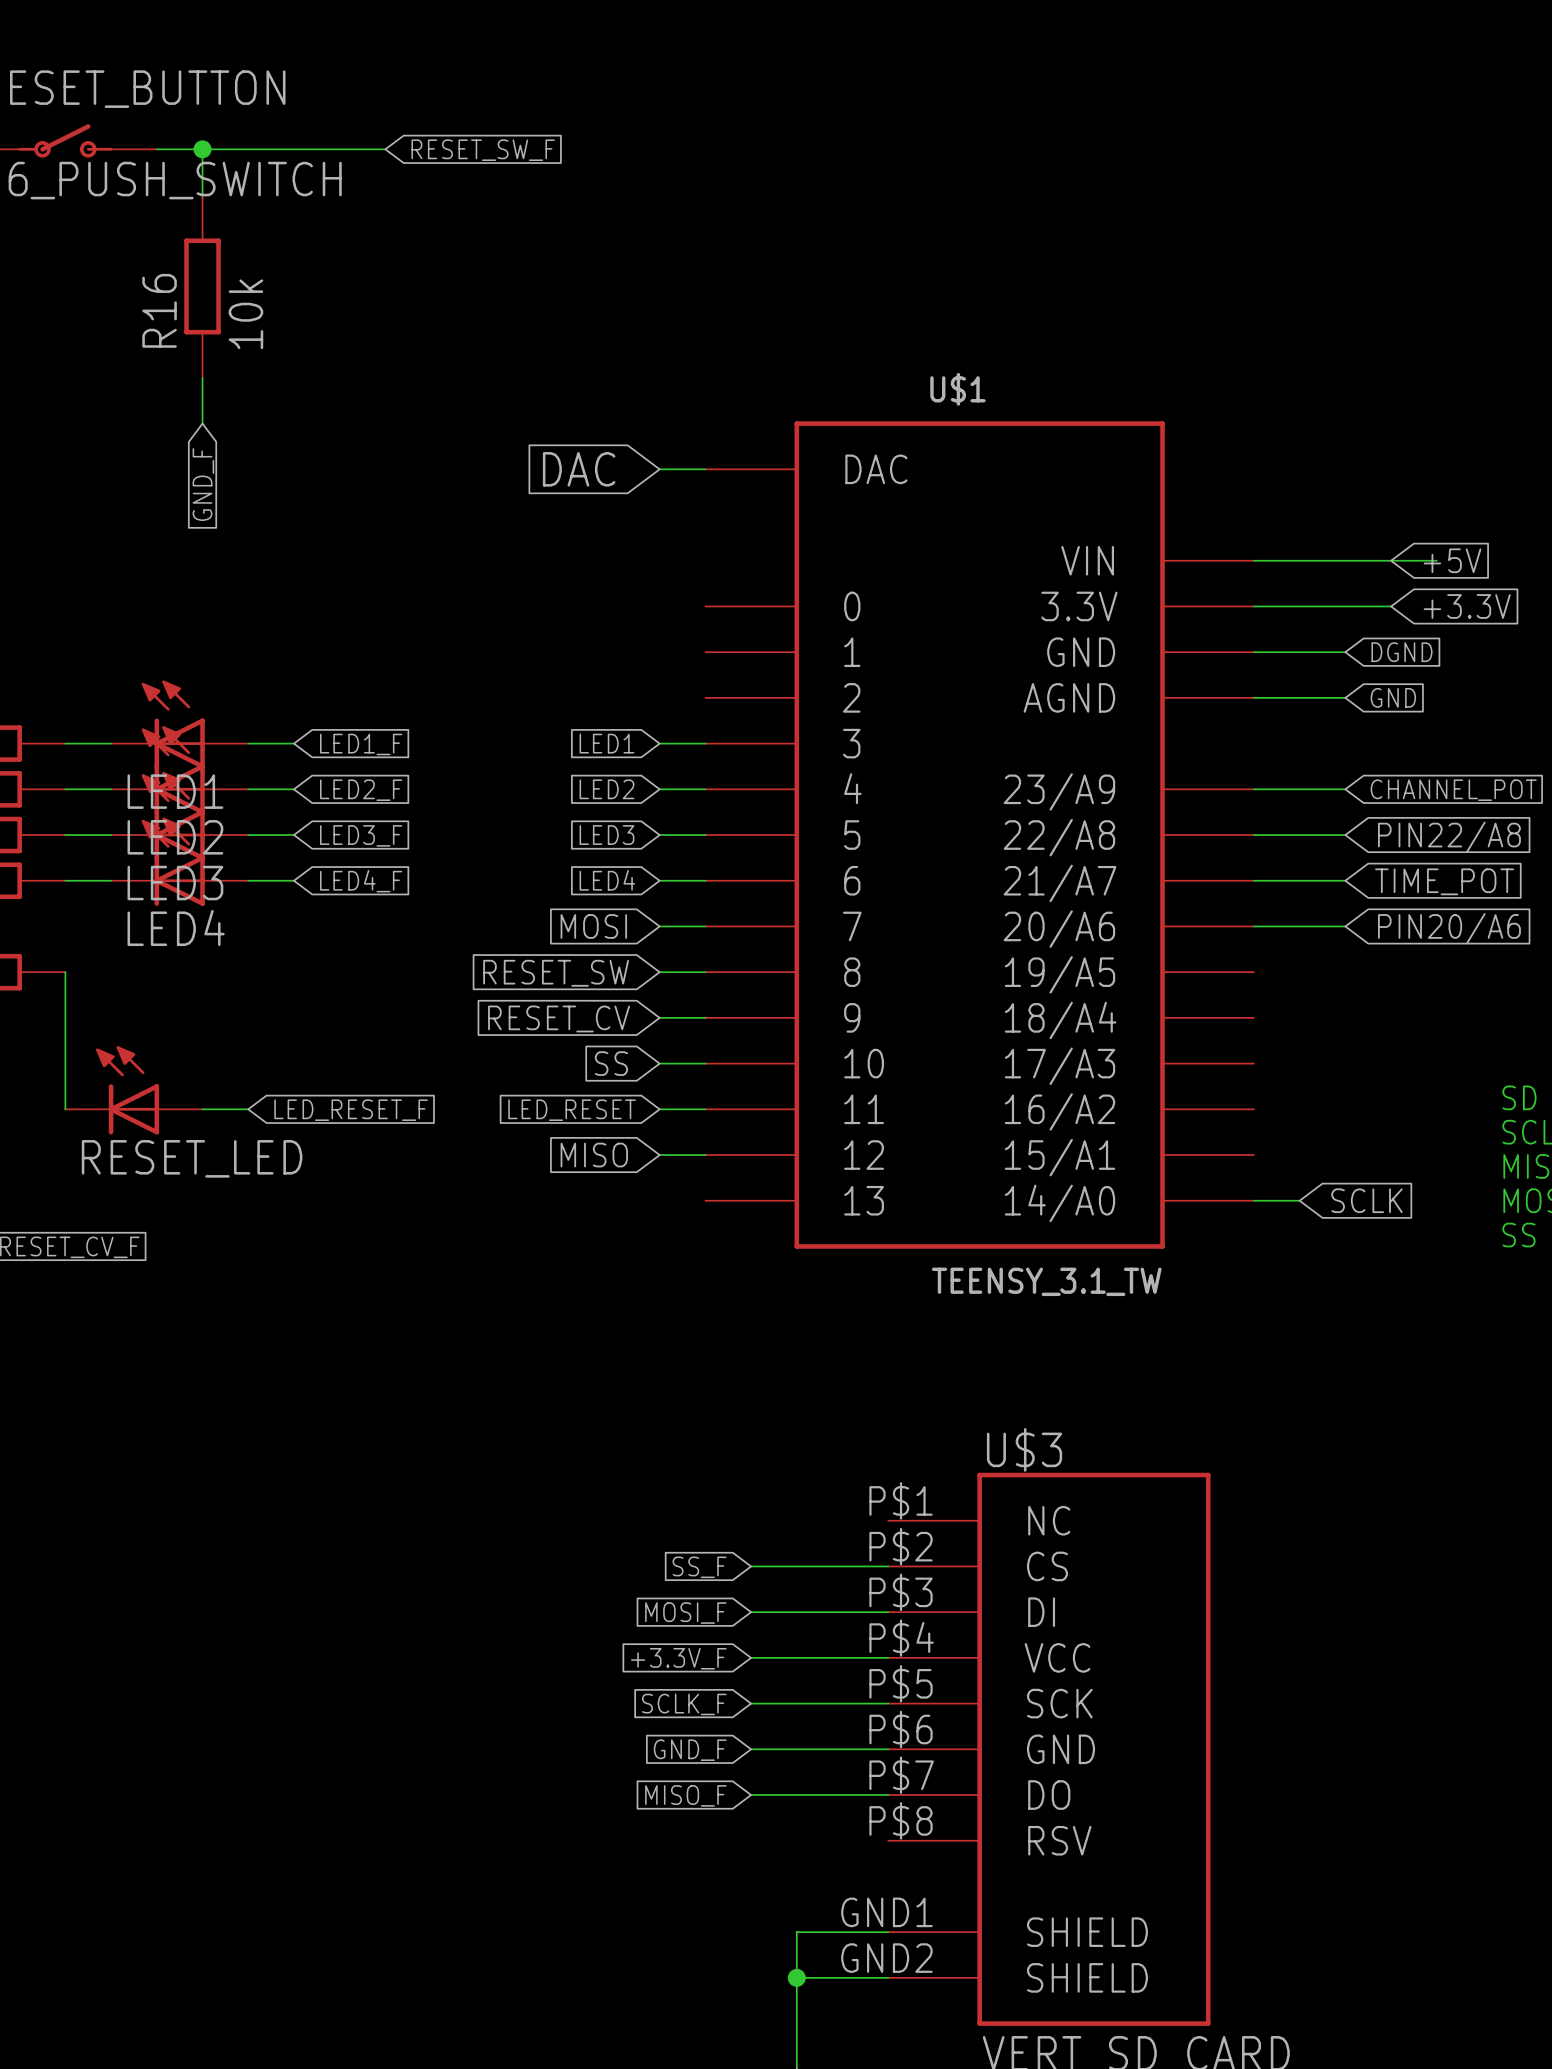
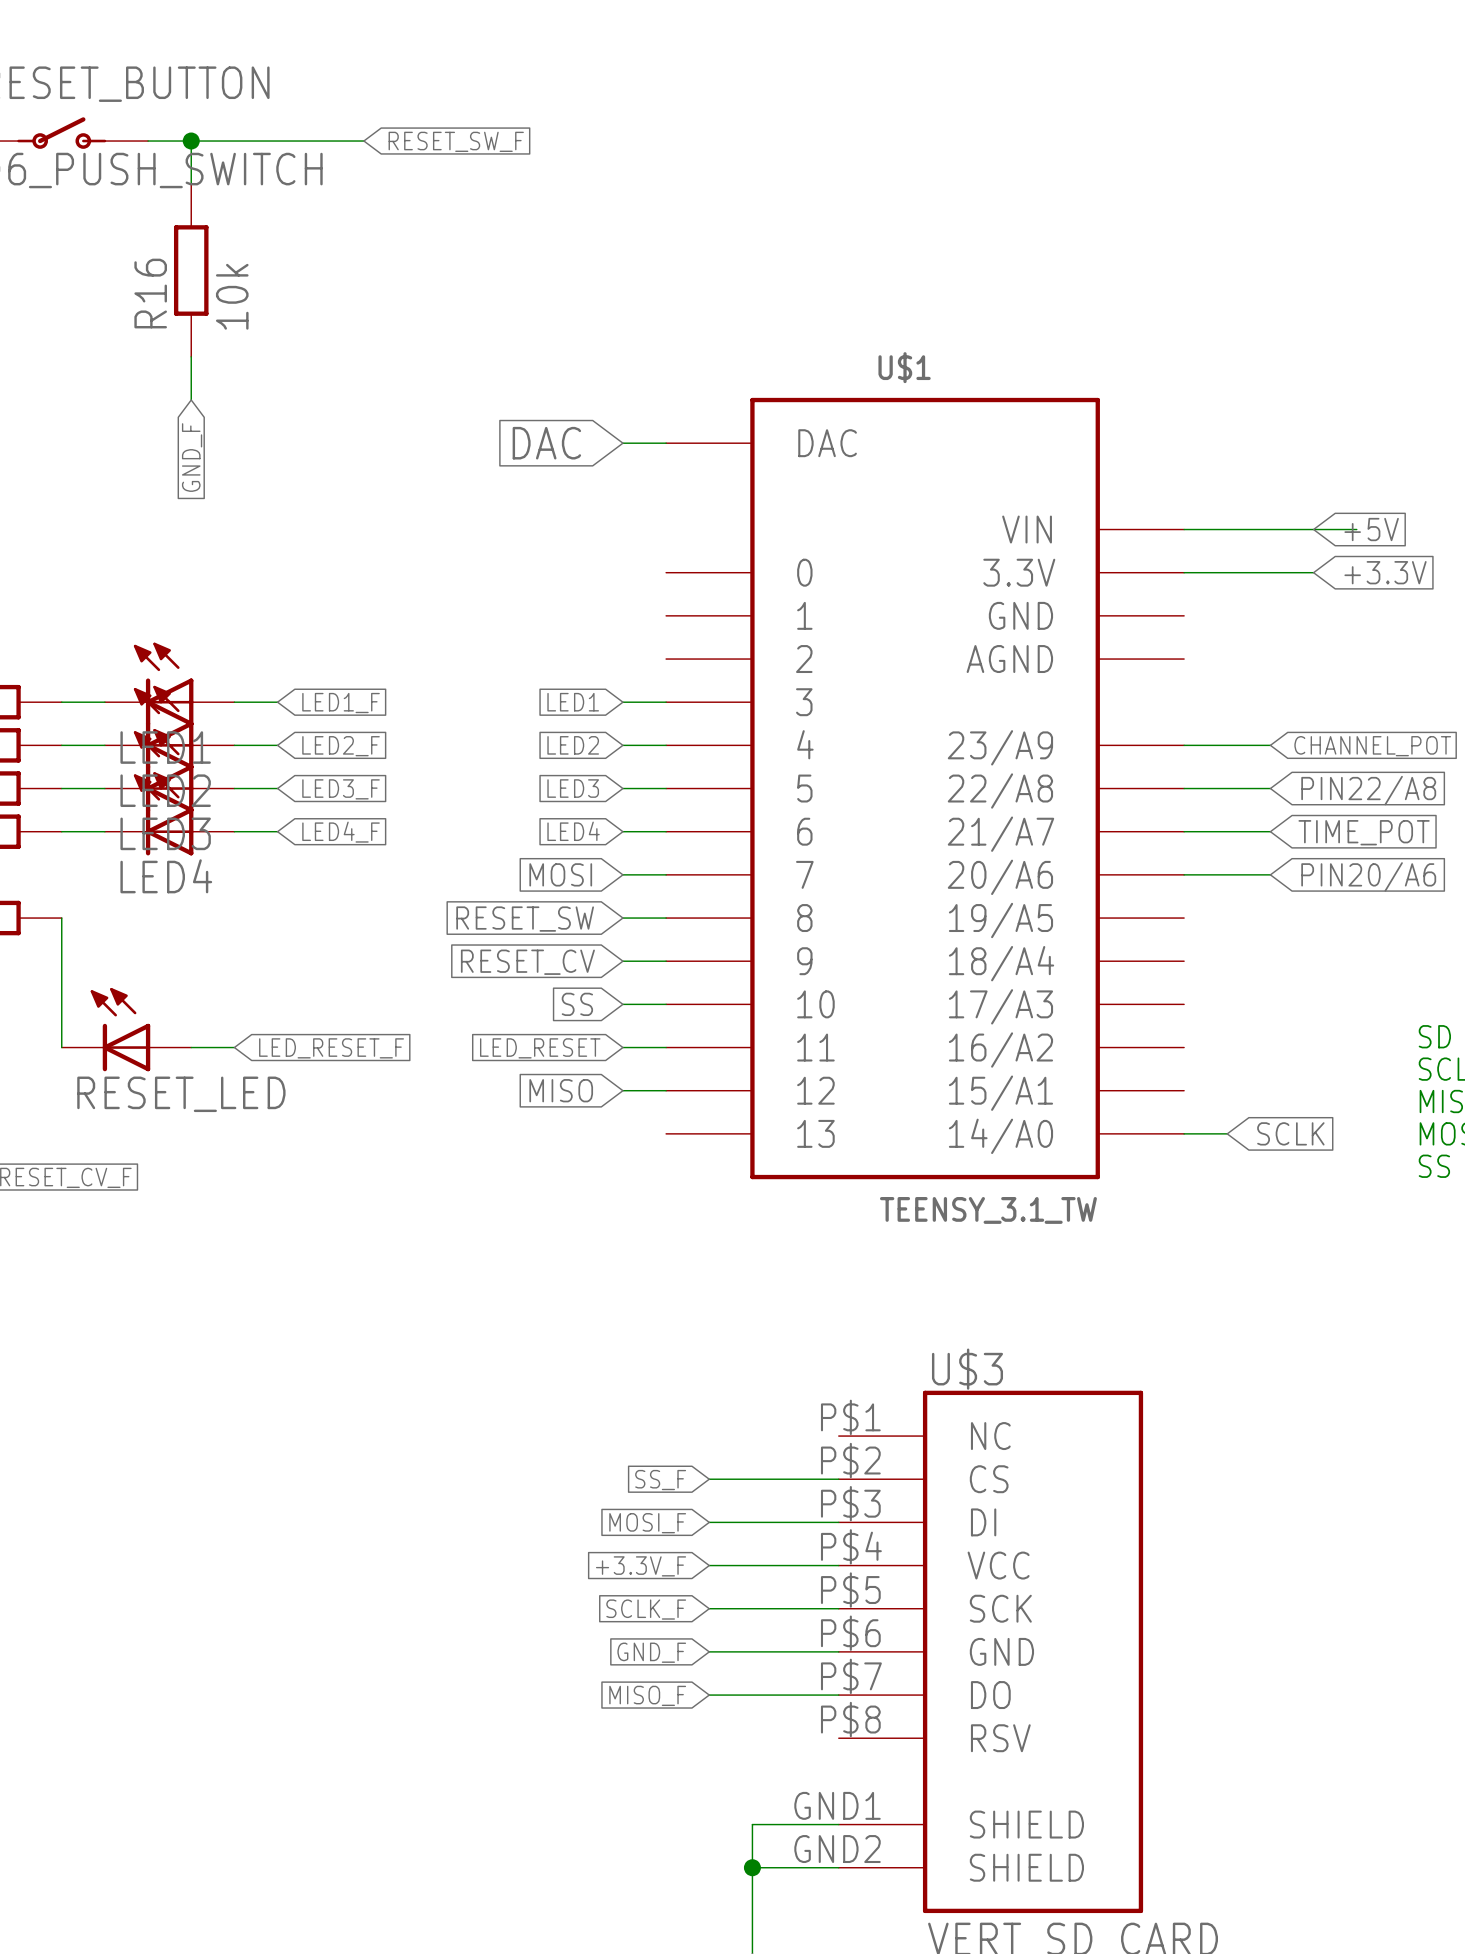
wire: (1253, 652) (1345, 652) -> none
global label: DGND (1401, 652) -> none
wire: (1253, 697) (1345, 697) -> none
global label: GND (1393, 697) -> none

